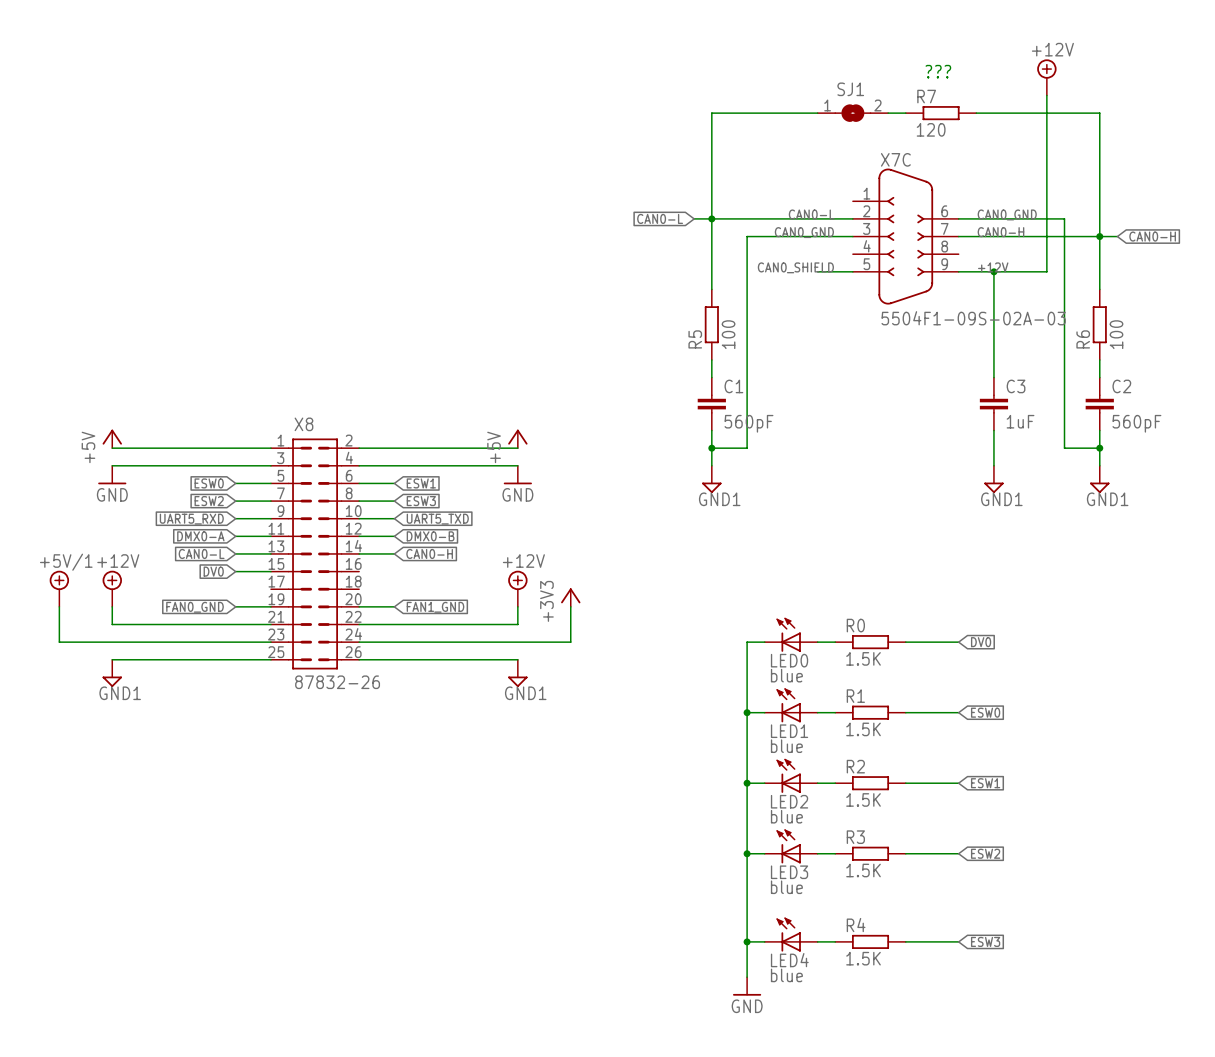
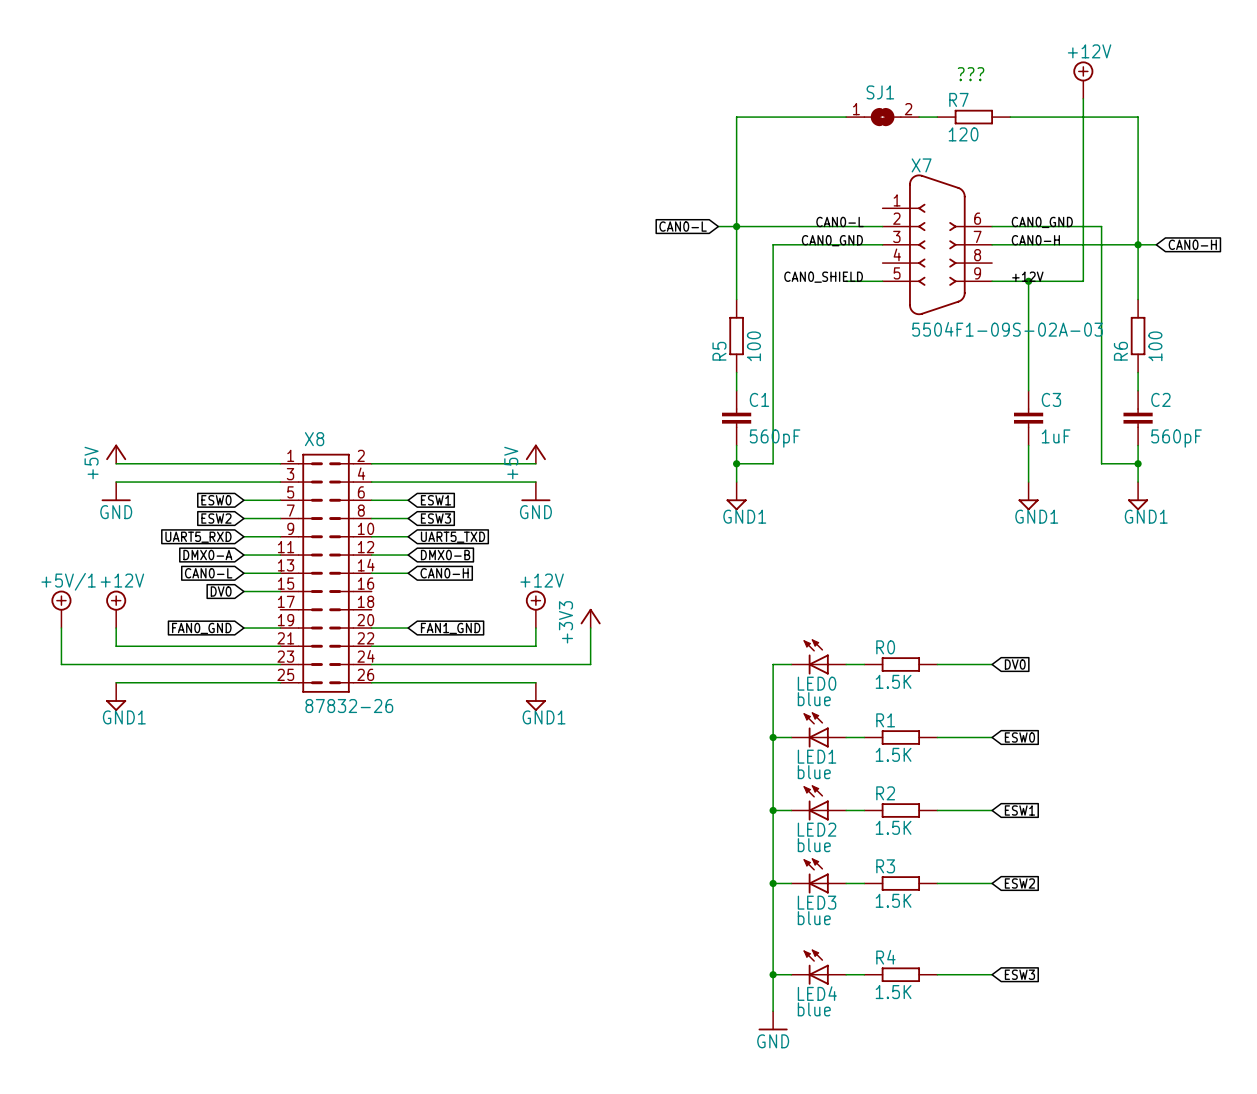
X7C name: X7C (895, 159) -> X7 (921, 165)

